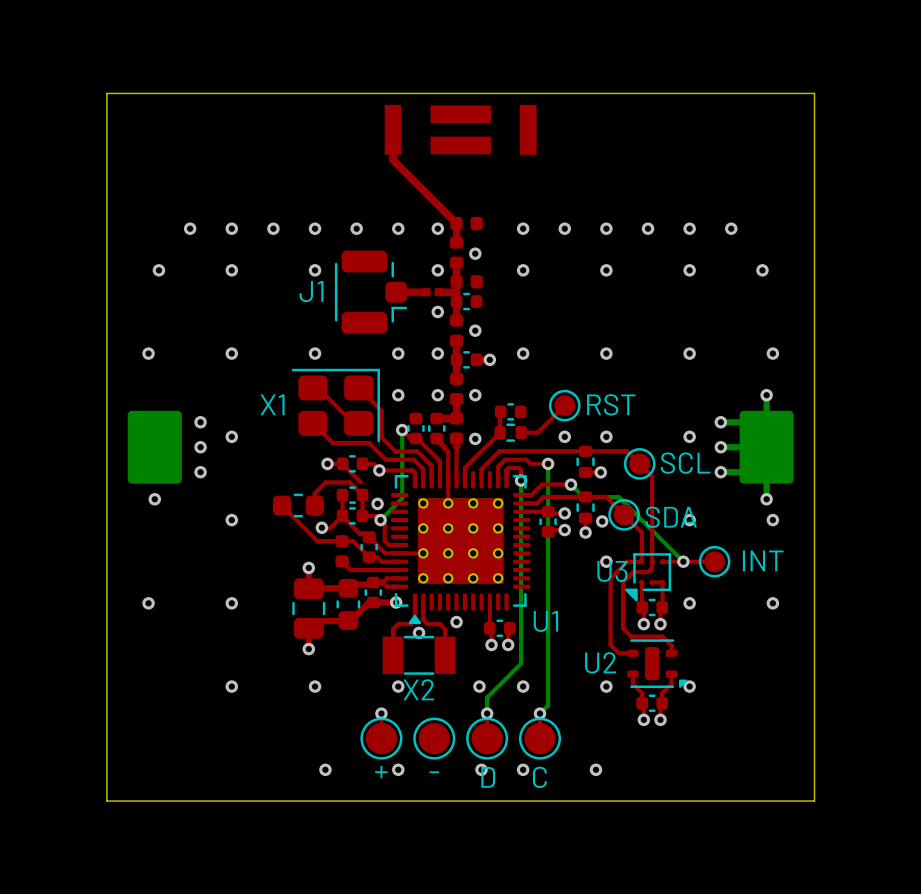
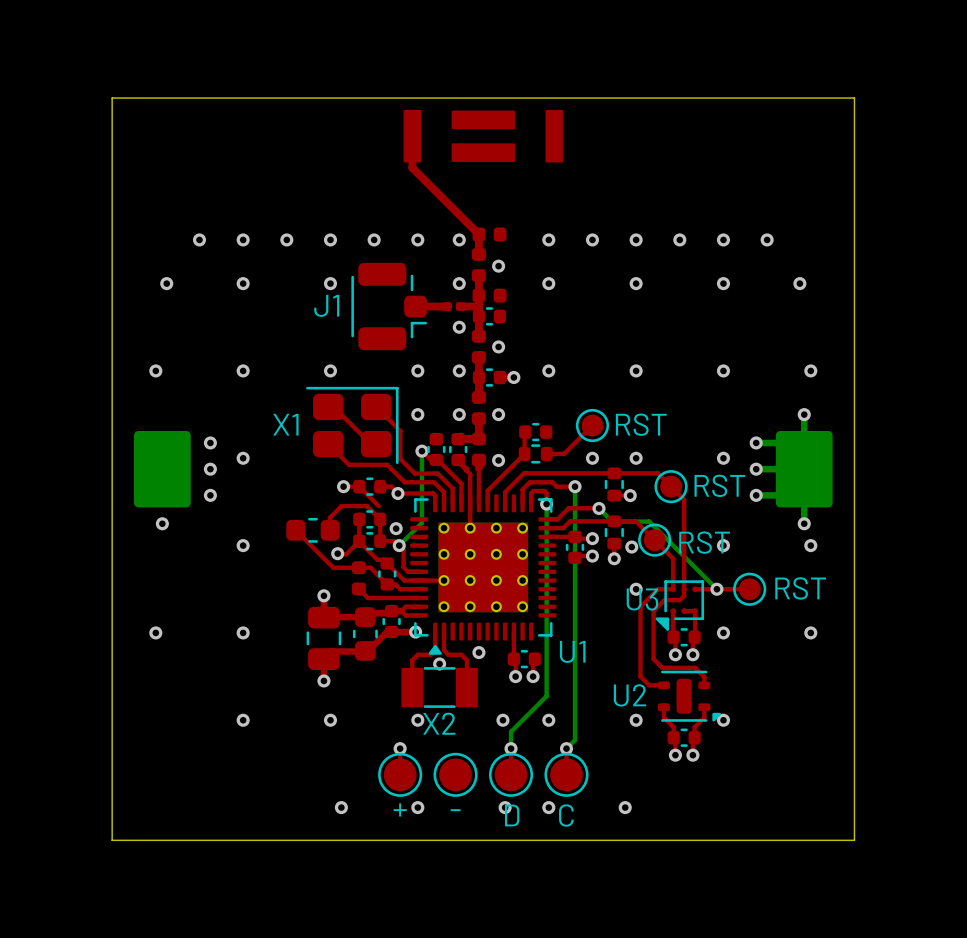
text: SCL (685, 463) -> RST (719, 485)
text: SDA (671, 517) -> RST (704, 542)
text: INT (763, 560) -> RST (800, 588)

